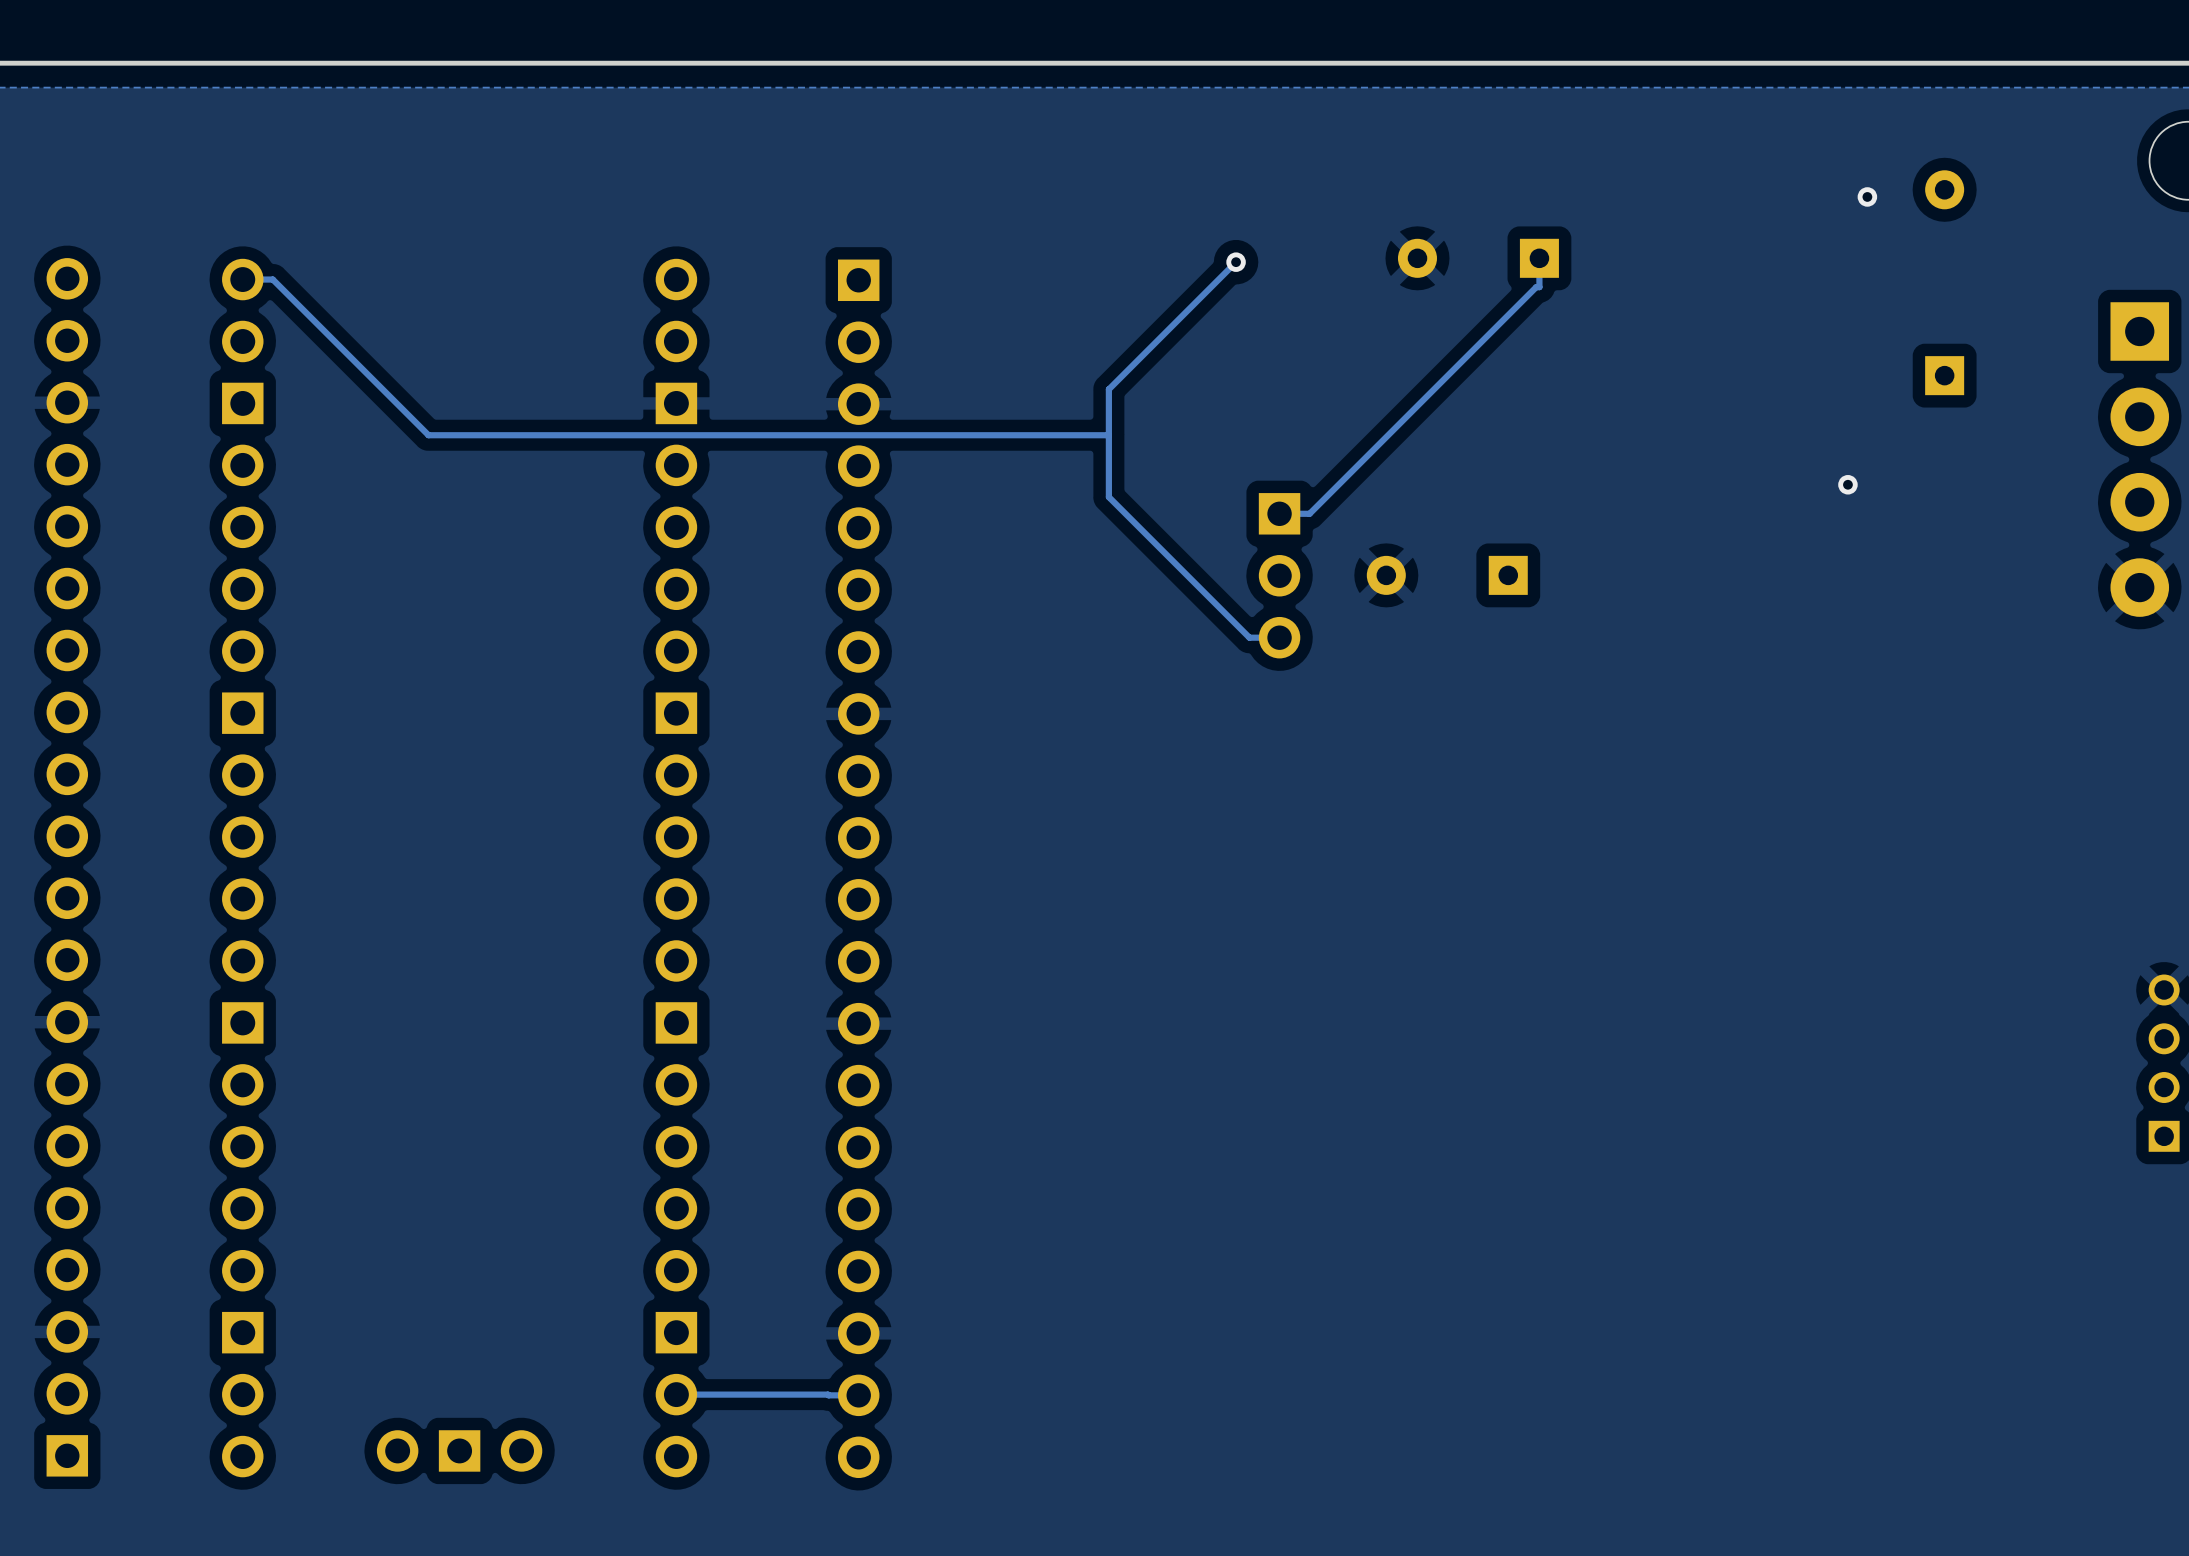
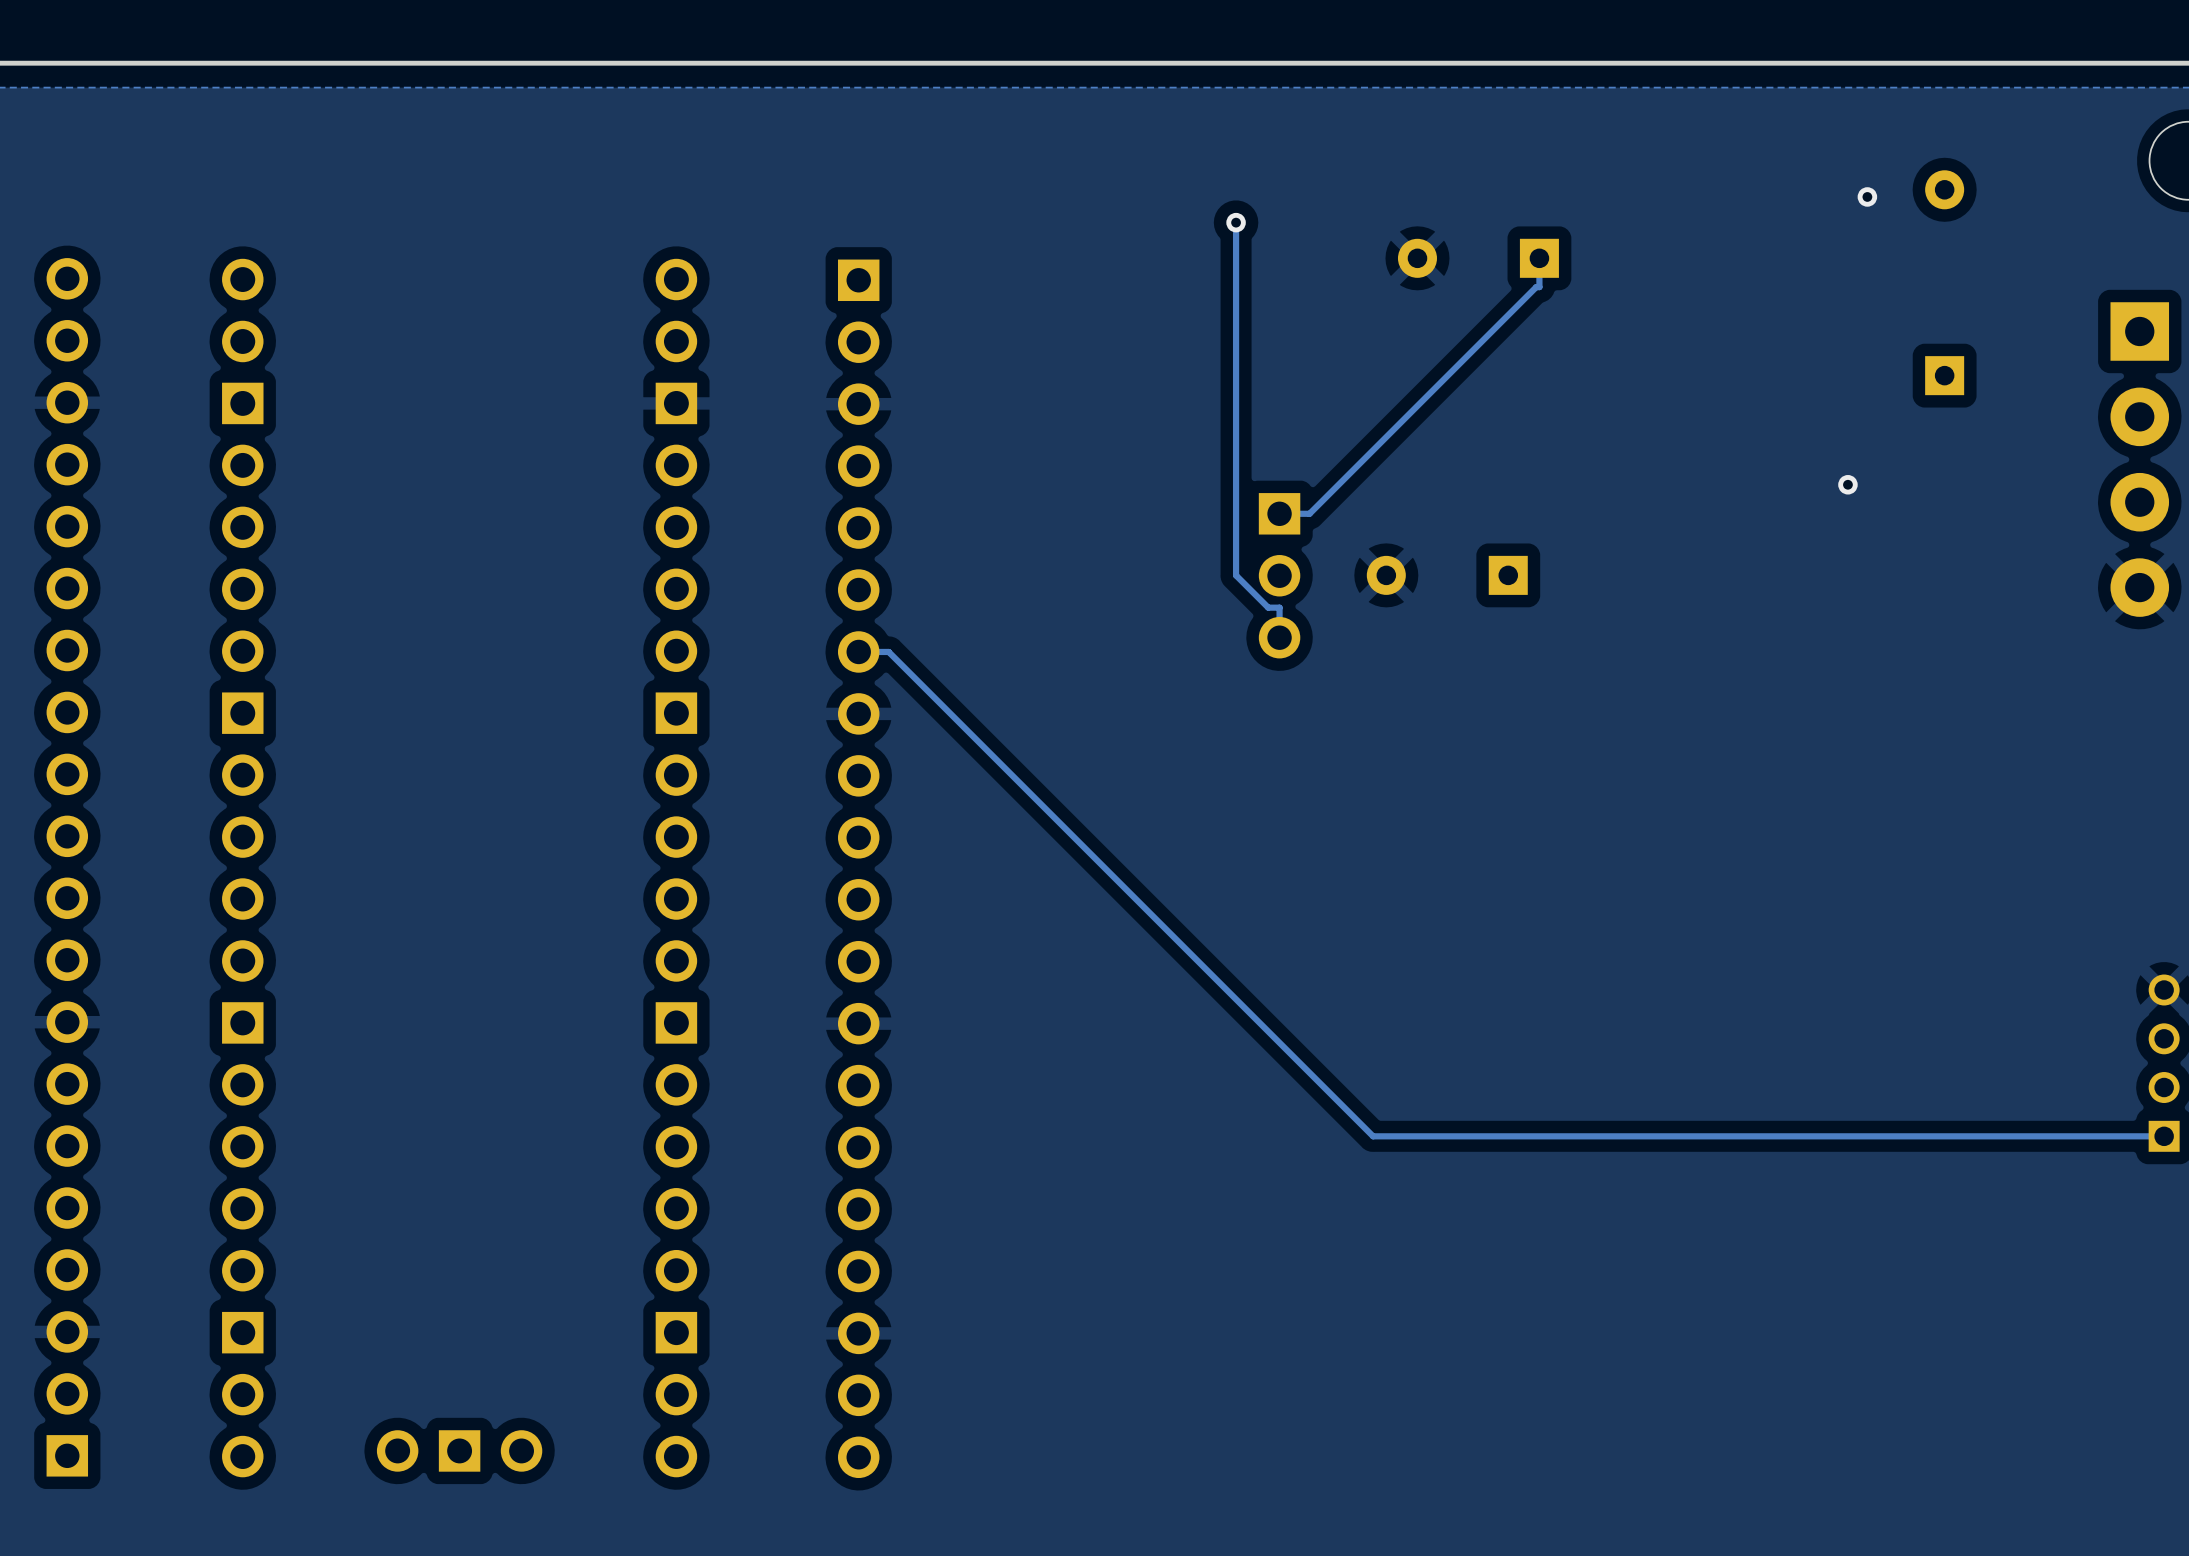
track: (1236, 262) (1108, 389) (1108, 497) (1249, 637) (1279, 637) -> (1236, 222) (1236, 575) (1268, 607) (1279, 607) (1279, 637)
via position: (1236, 262) -> (1236, 222)
track: (242, 279) (272, 279) (428, 435) (1108, 435) -> none
track: none -> (858, 651) (888, 651) (1373, 1136) (2164, 1136)
track: (676, 1394) (858, 1395) -> none

